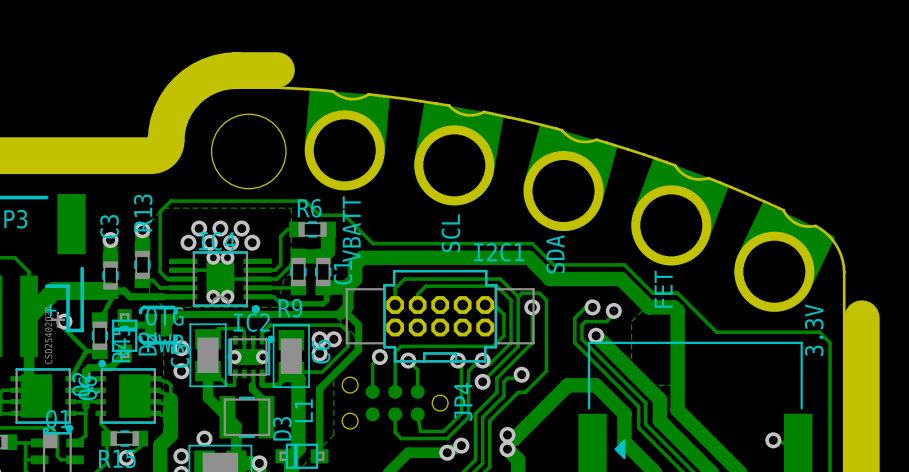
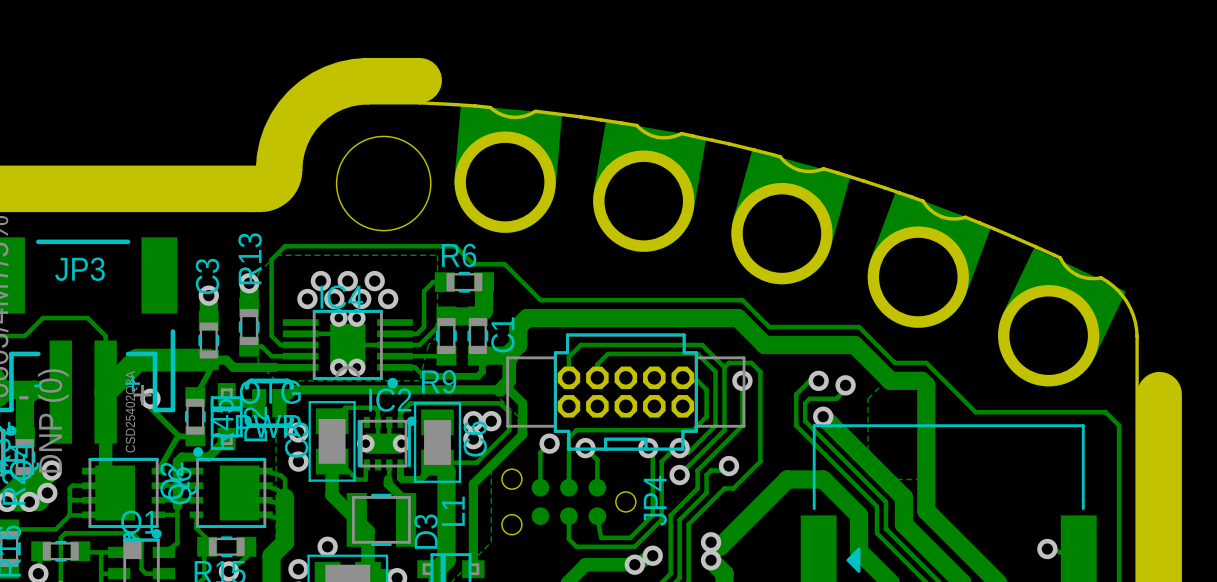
text: VBATT (351, 229) -> none
text: SCL (450, 233) -> none
text: I2C1 (499, 252) -> none
text: SDA (555, 254) -> none
text: FET (663, 289) -> none
text: 3.3V (814, 330) -> none

